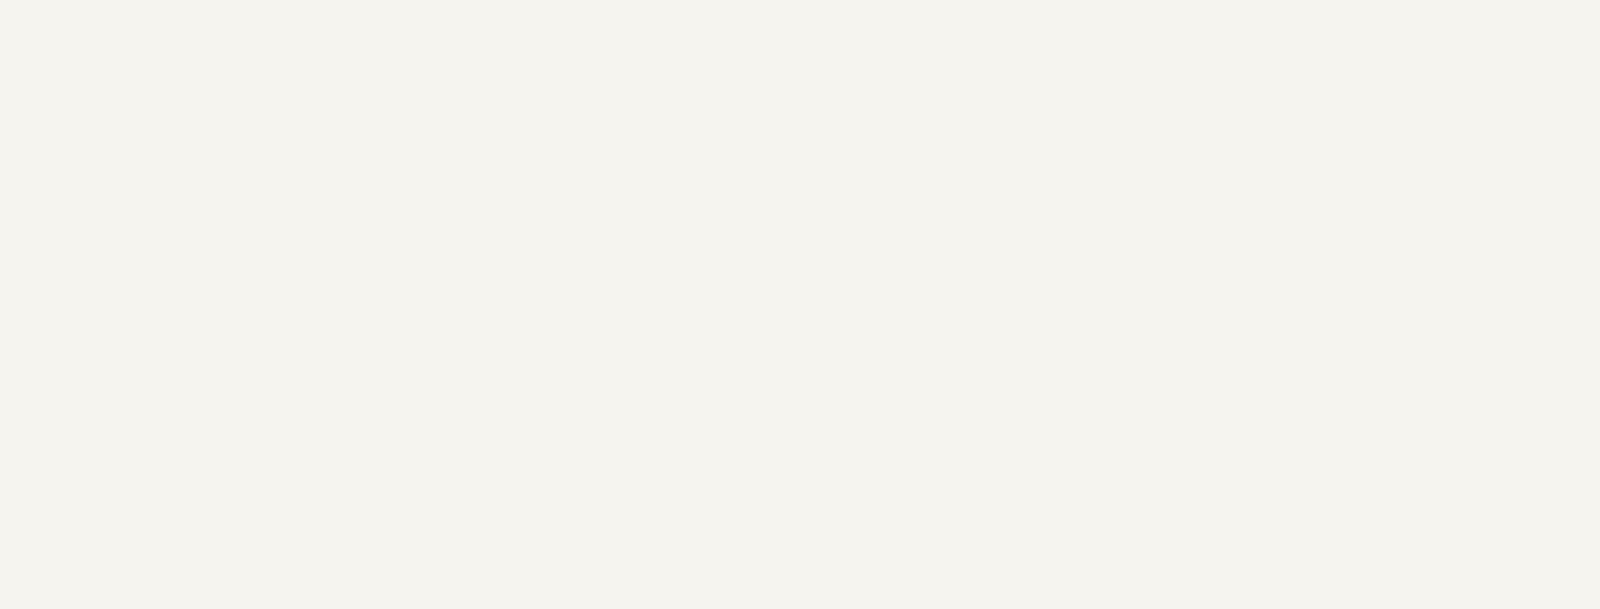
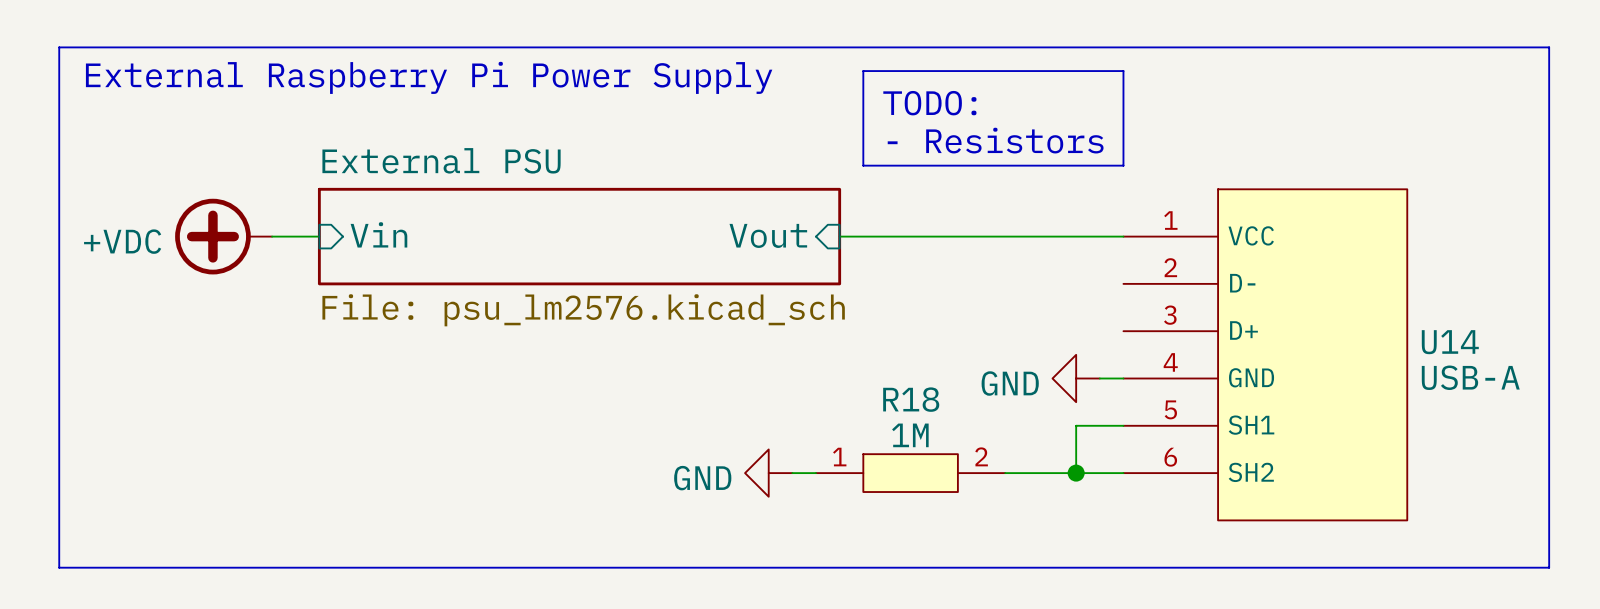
line: none -> (59, 47) (1549, 47) (1549, 567) (59, 567) (59, 47)
line: none -> (863, 71) (1123, 71) (1123, 165) (863, 165) (863, 71)
text: none -> External Raspberry Pi Power Supply (429, 77)
text: none -> TODO: (929, 103)
text: none -> - Resistors (995, 140)
sheet pin: none -> Vin (378, 234)
sheet pin: none -> Vout (768, 235)
power symbol: none -> +VDC (223, 236)
wire: none -> (272, 236) (319, 236)
sheet External PSU: none -> File: psu_lm2576.kicad_sch (579, 236)
wire: none -> (839, 236) (1123, 236)
U14: none -> USB-A (1265, 354)
power symbol: none -> GND (1076, 378)
wire: none -> (1099, 378) (1123, 378)
wire: none -> (1123, 425) (1076, 425) (1076, 473)
power symbol: none -> GND (768, 473)
wire: none -> (792, 473) (816, 473)
R18: none -> 1M (910, 473)
wire: none -> (1005, 473) (1123, 473)
junction: none -> (1076, 473)

